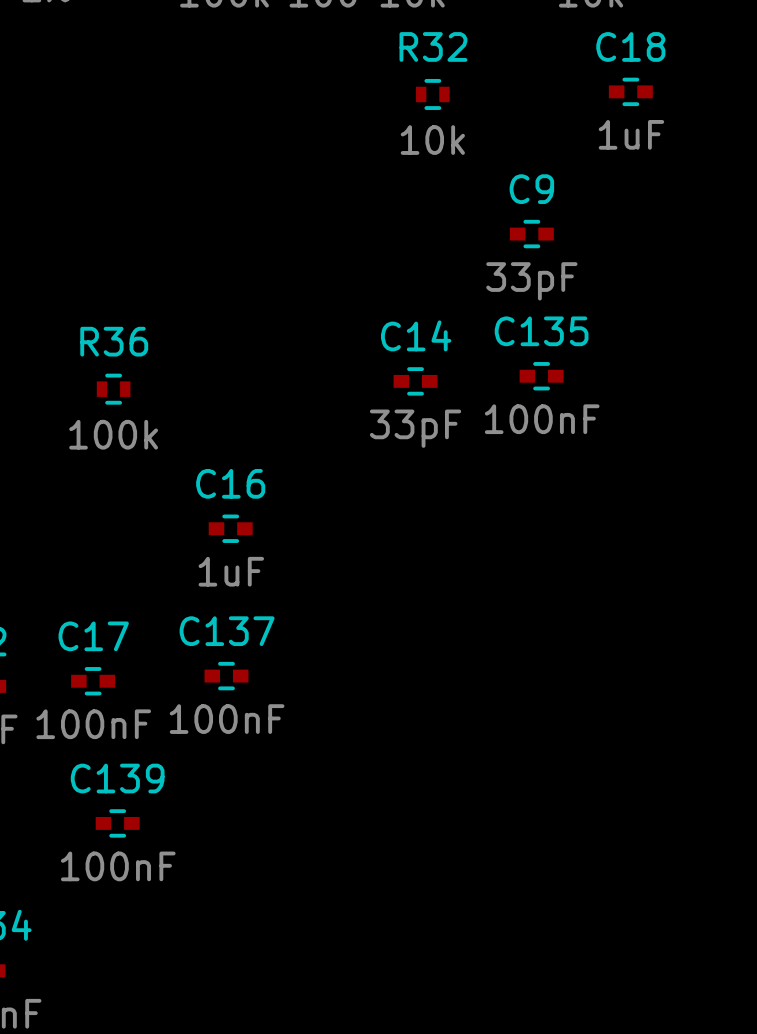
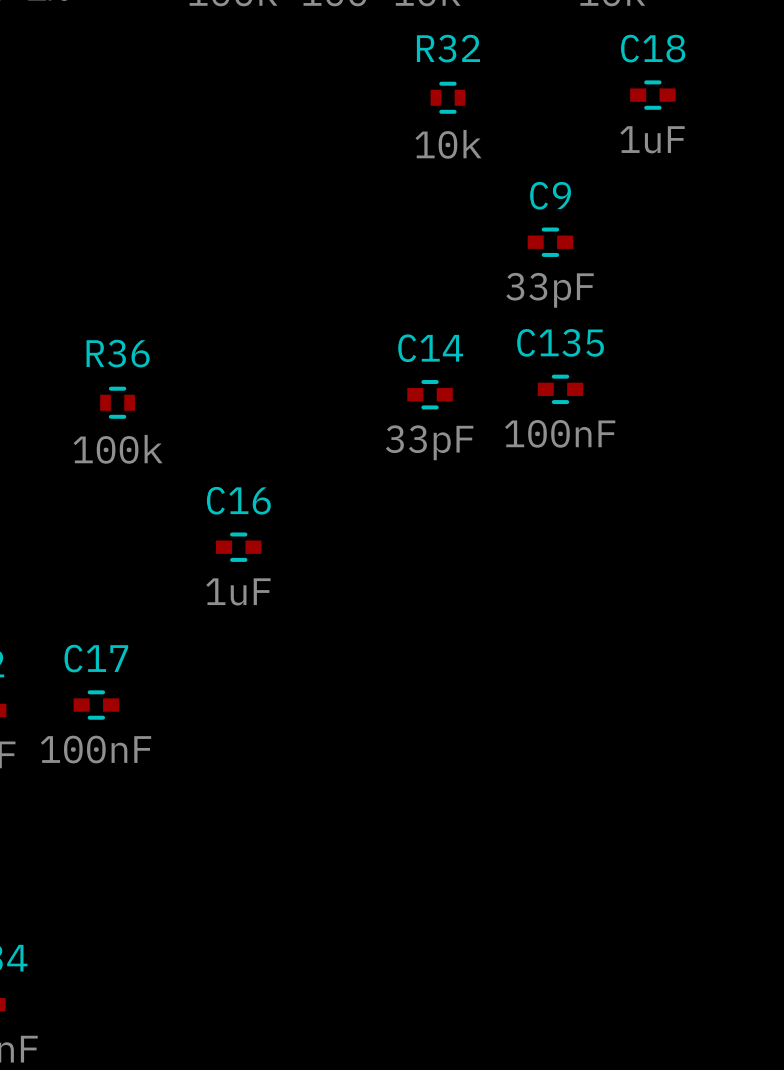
C137: 100nF (226, 676) -> none
C139: 100nF (117, 823) -> none

